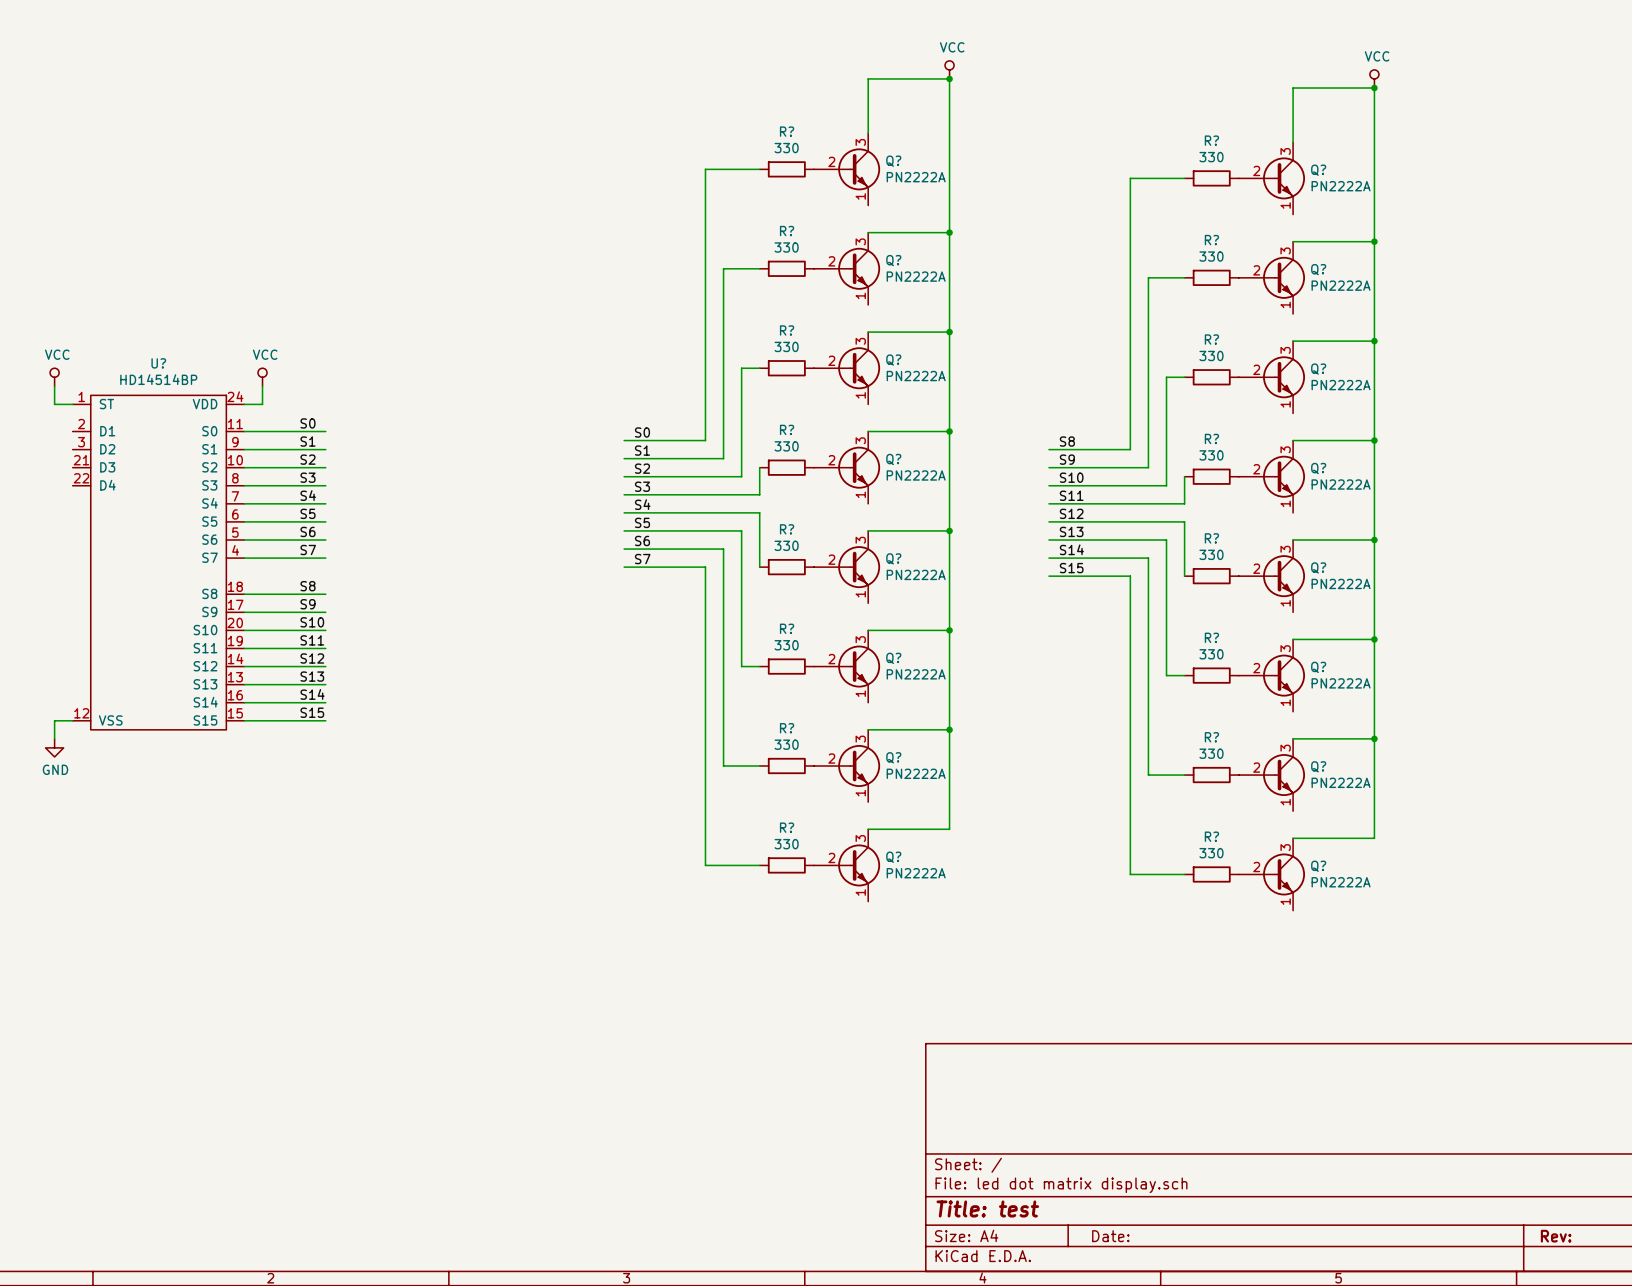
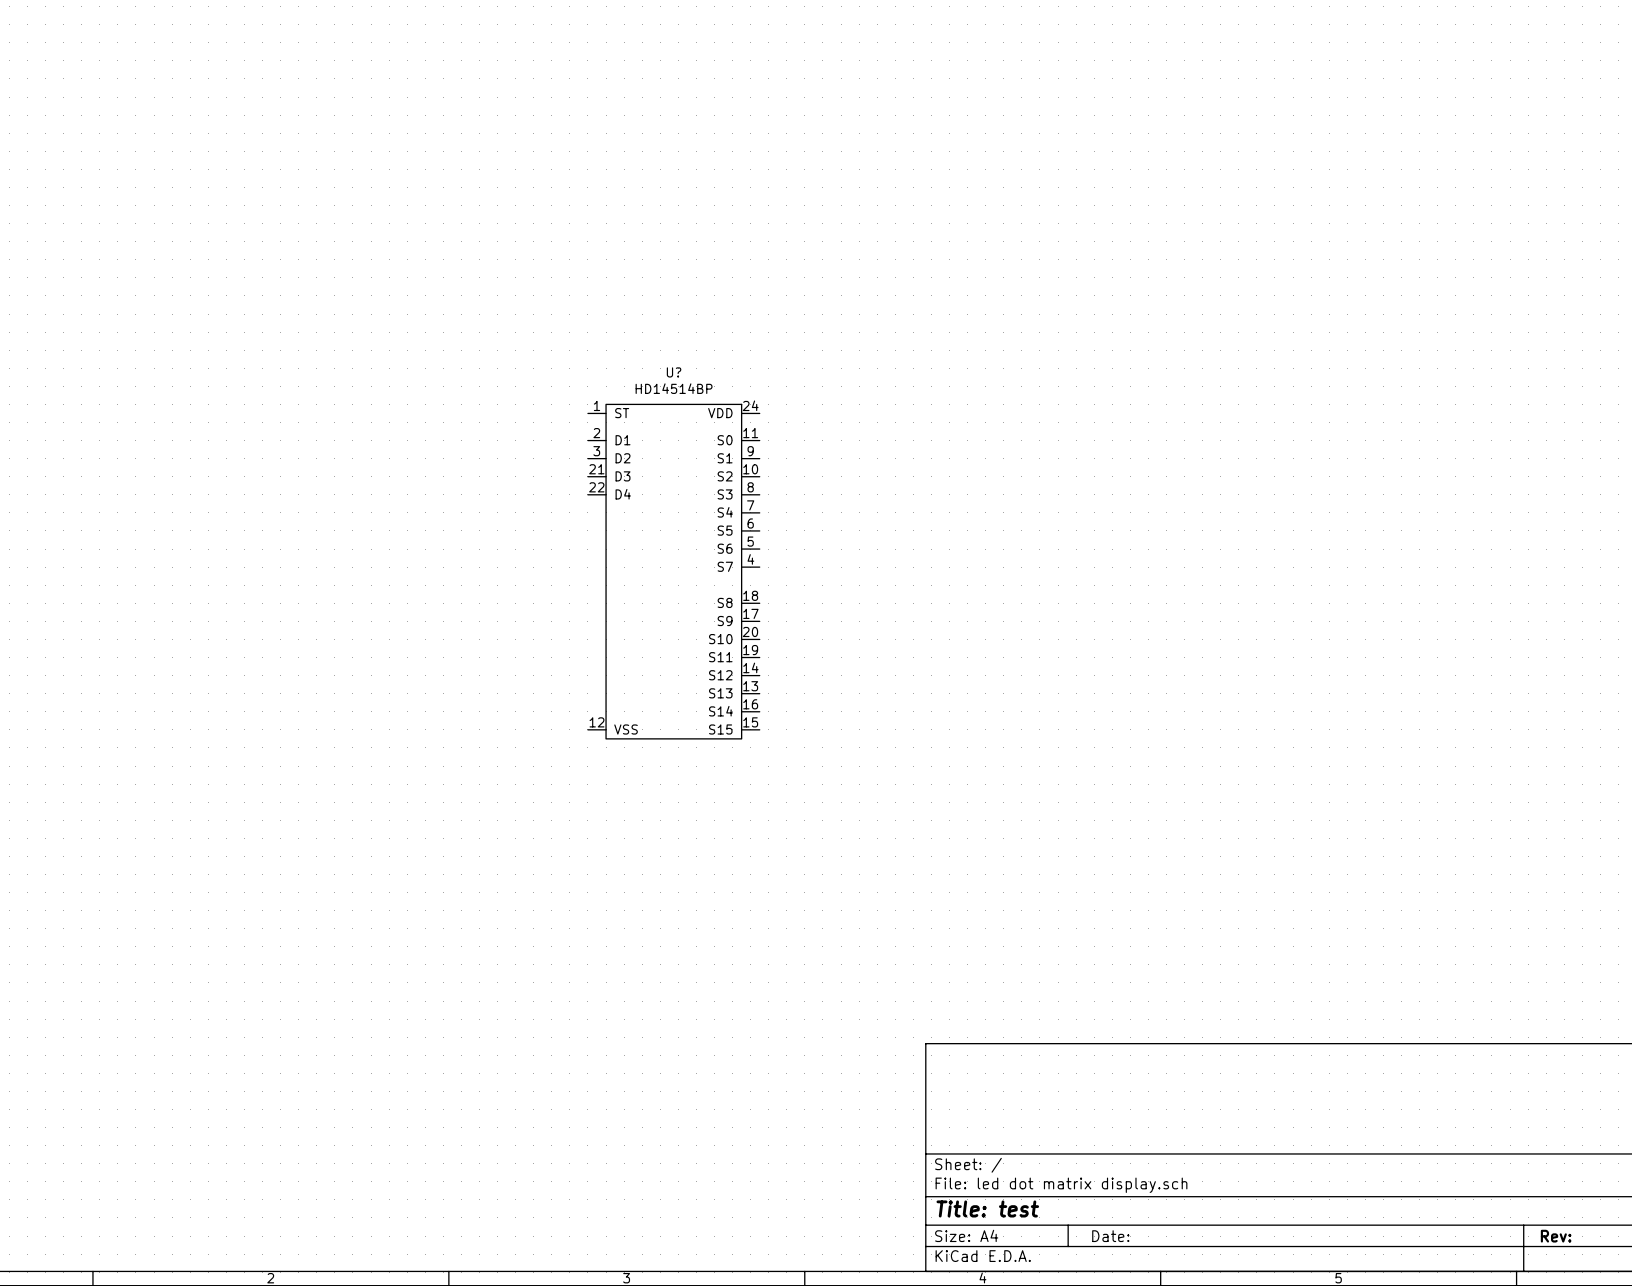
power symbol: VCC (949, 69) -> none
junction: (949, 78) -> none
power symbol: VCC (1374, 78) -> none
junction: (1374, 88) -> none
wire: (868, 133) (868, 78) (949, 78) (949, 829) (868, 829) -> none
wire: (1293, 142) (1293, 88) (1374, 88) (1374, 838) (1293, 838) -> none
wire: (759, 169) (705, 169) (705, 440) (624, 440) -> none
R?: 330 (786, 169) -> none
Q?: PN2222A (847, 169) -> none
wire: (1184, 178) (1130, 178) (1130, 449) (1048, 449) -> none
R?: 330 (1211, 178) -> none
Q?: PN2222A (1271, 178) -> none
wire: (868, 232) (949, 232) -> none
junction: (949, 232) -> none
wire: (1293, 241) (1374, 241) -> none
junction: (1374, 241) -> none
wire: (759, 268) (723, 268) (723, 458) (624, 458) -> none
R?: 330 (786, 268) -> none
Q?: PN2222A (847, 268) -> none
wire: (1184, 277) (1148, 277) (1148, 467) (1048, 467) -> none
R?: 330 (1211, 277) -> none
Q?: PN2222A (1271, 277) -> none
wire: (868, 332) (949, 332) -> none
junction: (949, 332) -> none
wire: (1293, 341) (1374, 341) -> none
junction: (1374, 341) -> none
wire: (759, 368) (741, 368) (741, 476) (624, 476) -> none
R?: 330 (786, 368) -> none
Q?: PN2222A (847, 368) -> none
power symbol: VCC (54, 377) -> none
power symbol: VCC (262, 377) -> none
wire: (1184, 377) (1166, 377) (1166, 485) (1048, 485) -> none
R?: 330 (1211, 377) -> none
Q?: PN2222A (1271, 377) -> none
wire: (54, 386) (54, 404) (72, 404) -> none
wire: (262, 386) (262, 404) (244, 404) -> none
label: S0 (308, 423) -> none
wire: (244, 431) (325, 431) -> none
wire: (868, 431) (949, 431) -> none
junction: (949, 431) -> none
label: S0 (642, 432) -> none
wire: (1293, 440) (1374, 440) -> none
junction: (1374, 440) -> none
label: S1 (308, 441) -> none
label: S8 (1067, 441) -> none
wire: (244, 449) (325, 449) -> none
label: S1 (642, 450) -> none
label: S2 (308, 459) -> none
label: S9 (1067, 459) -> none
wire: (244, 467) (325, 467) -> none
wire: (759, 467) (759, 494) (624, 494) -> none
R?: 330 (786, 467) -> none
Q?: PN2222A (847, 467) -> none
label: S2 (642, 468) -> none
wire: (1184, 476) (1184, 503) (1048, 503) -> none
R?: 330 (1211, 476) -> none
Q?: PN2222A (1271, 476) -> none
label: S3 (308, 477) -> none
label: S10 (1071, 477) -> none
wire: (244, 485) (325, 485) -> none
label: S3 (642, 486) -> none
label: S4 (308, 495) -> none
label: S11 (1071, 495) -> none
wire: (244, 503) (325, 503) -> none
label: S4 (642, 504) -> none
wire: (624, 512) (759, 512) (759, 567) -> none
label: S5 (308, 513) -> none
label: S12 (1071, 513) -> none
wire: (244, 521) (325, 521) -> none
wire: (1048, 521) (1184, 521) (1184, 576) -> none
label: S5 (642, 522) -> none
wire: (624, 530) (741, 530) (741, 666) (759, 666) -> none
wire: (868, 530) (949, 530) -> none
junction: (949, 530) -> none
label: S6 (308, 531) -> none
label: S13 (1071, 531) -> none
wire: (244, 540) (325, 540) -> none
label: S6 (642, 540) -> none
wire: (1048, 540) (1166, 540) (1166, 675) (1184, 675) -> none
wire: (1293, 540) (1374, 540) -> none
junction: (1374, 540) -> none
wire: (624, 549) (723, 549) (723, 766) (759, 766) -> none
label: S14 (1071, 549) -> none
label: S7 (308, 550) -> none
wire: (244, 558) (325, 558) -> none
wire: (1048, 558) (1148, 558) (1148, 775) (1184, 775) -> none
label: S7 (642, 559) -> none
U?: HD14514BP (158, 562) -> none
wire: (624, 567) (705, 567) (705, 865) (759, 865) -> none
R?: 330 (786, 567) -> none
Q?: PN2222A (847, 567) -> none
label: S15 (1071, 568) -> none
U?: none -> HD14514BP (673, 571)
wire: (1048, 576) (1130, 576) (1130, 874) (1184, 874) -> none
R?: 330 (1211, 576) -> none
Q?: PN2222A (1271, 576) -> none
label: S8 (308, 586) -> none
wire: (244, 594) (325, 594) -> none
label: S9 (308, 604) -> none
wire: (244, 612) (325, 612) -> none
label: S10 (312, 622) -> none
wire: (244, 630) (325, 630) -> none
wire: (868, 630) (949, 630) -> none
junction: (949, 630) -> none
wire: (1293, 639) (1374, 639) -> none
junction: (1374, 639) -> none
label: S11 (312, 640) -> none
wire: (244, 648) (325, 648) -> none
label: S12 (312, 658) -> none
wire: (244, 666) (325, 666) -> none
R?: 330 (786, 666) -> none
Q?: PN2222A (847, 666) -> none
R?: 330 (1211, 675) -> none
Q?: PN2222A (1271, 675) -> none
label: S13 (312, 676) -> none
wire: (244, 684) (325, 684) -> none
label: S14 (312, 694) -> none
wire: (244, 702) (325, 702) -> none
label: S15 (312, 712) -> none
wire: (72, 720) (54, 720) (54, 738) -> none
wire: (244, 720) (325, 720) -> none
wire: (868, 729) (949, 729) -> none
junction: (949, 729) -> none
wire: (1293, 738) (1374, 738) -> none
junction: (1374, 738) -> none
power symbol: GND (54, 747) -> none
R?: 330 (786, 766) -> none
Q?: PN2222A (847, 766) -> none
R?: 330 (1211, 775) -> none
Q?: PN2222A (1271, 775) -> none
R?: 330 (786, 865) -> none
Q?: PN2222A (847, 865) -> none
R?: 330 (1211, 874) -> none
Q?: PN2222A (1271, 874) -> none

